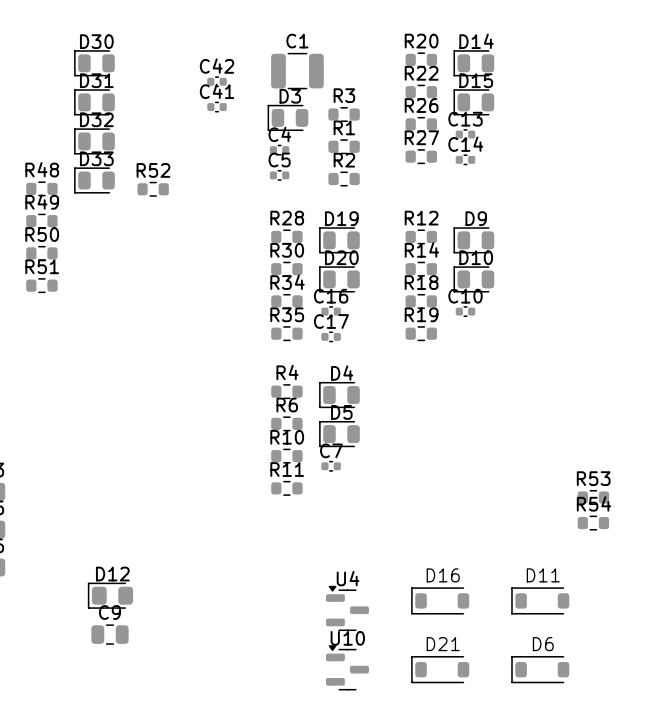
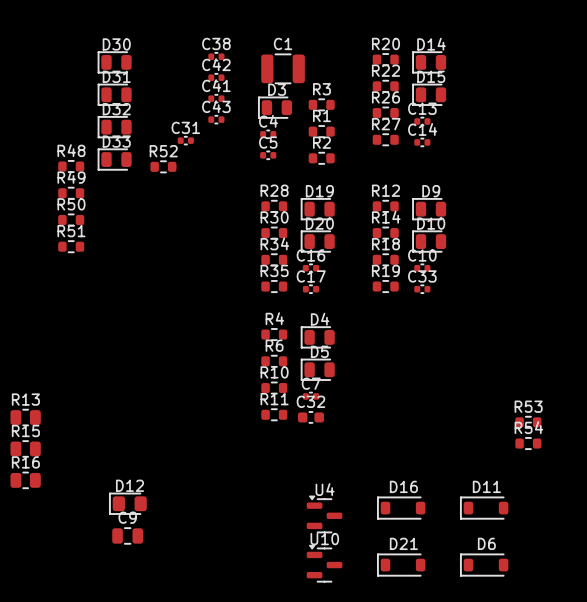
C38: none -> (216, 56)
C43: none -> (216, 119)
C31: none -> (185, 140)
C33: none -> (422, 289)
C32: none -> (310, 417)

